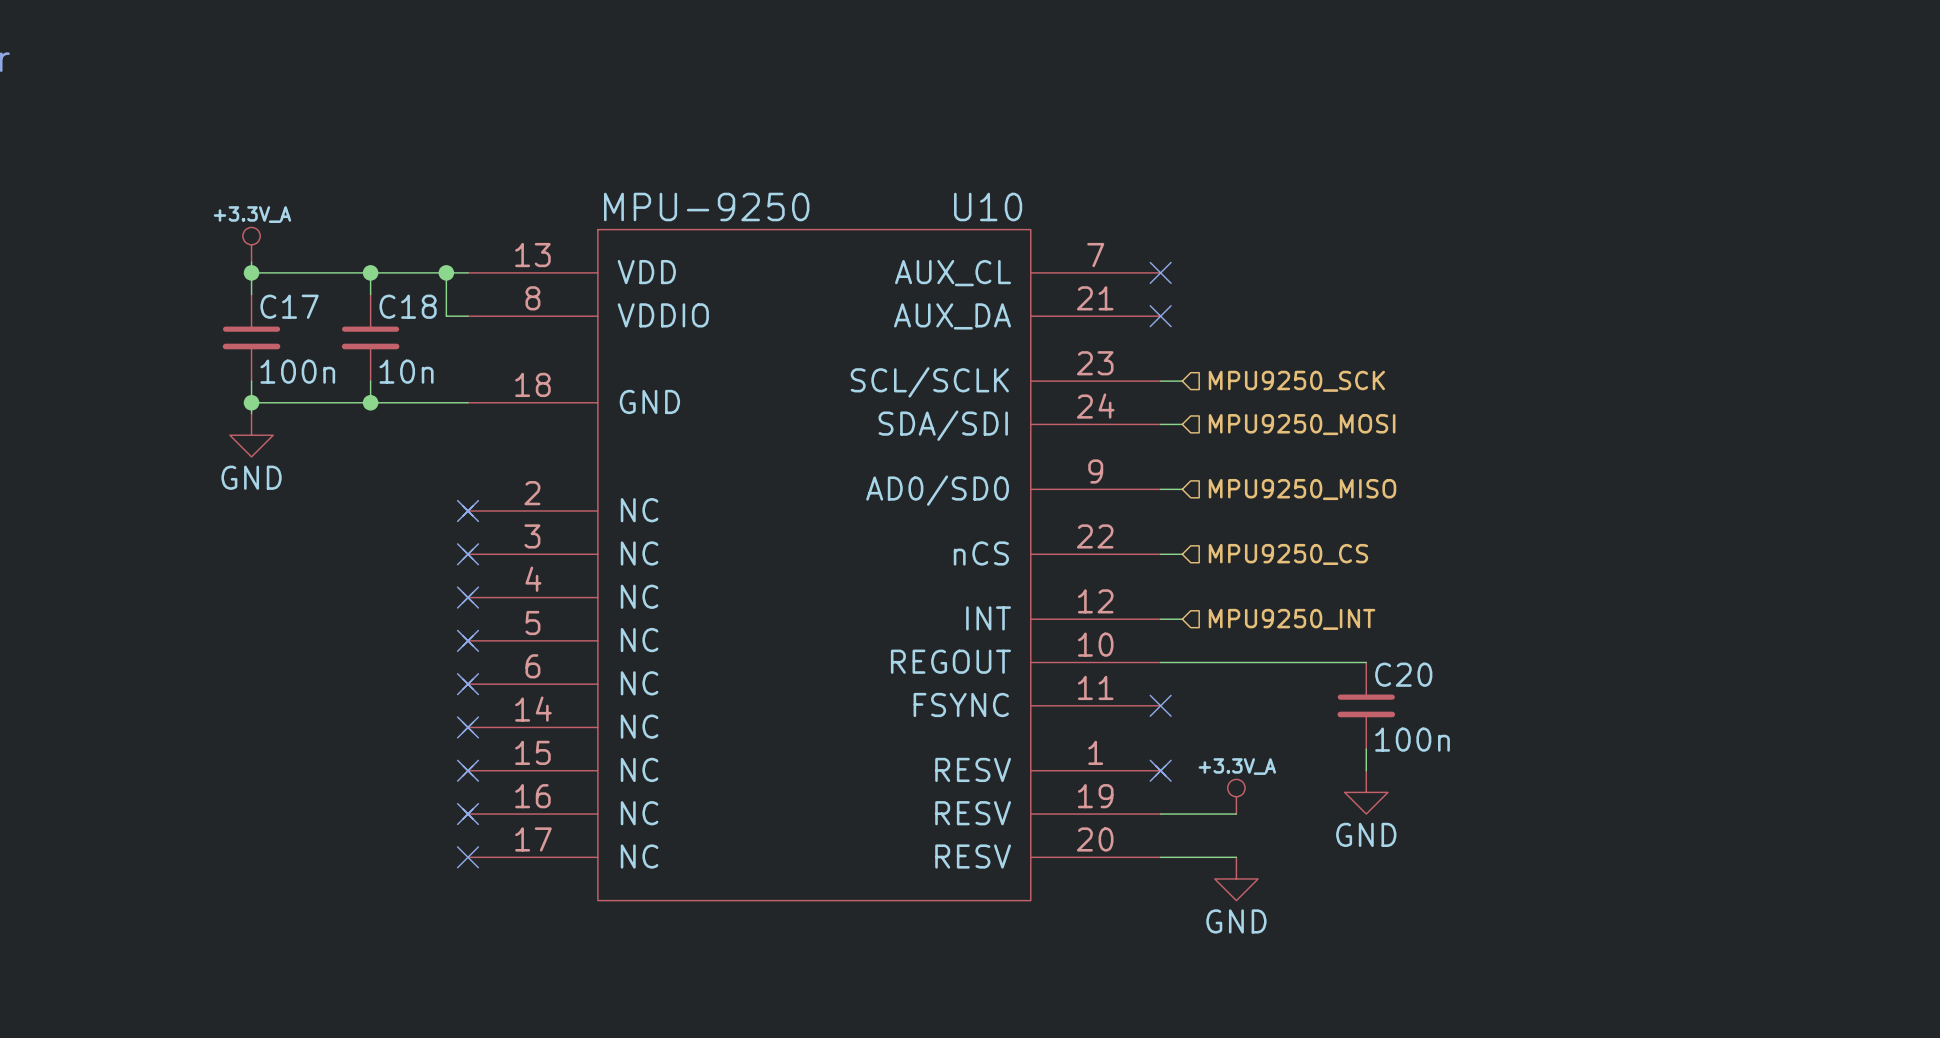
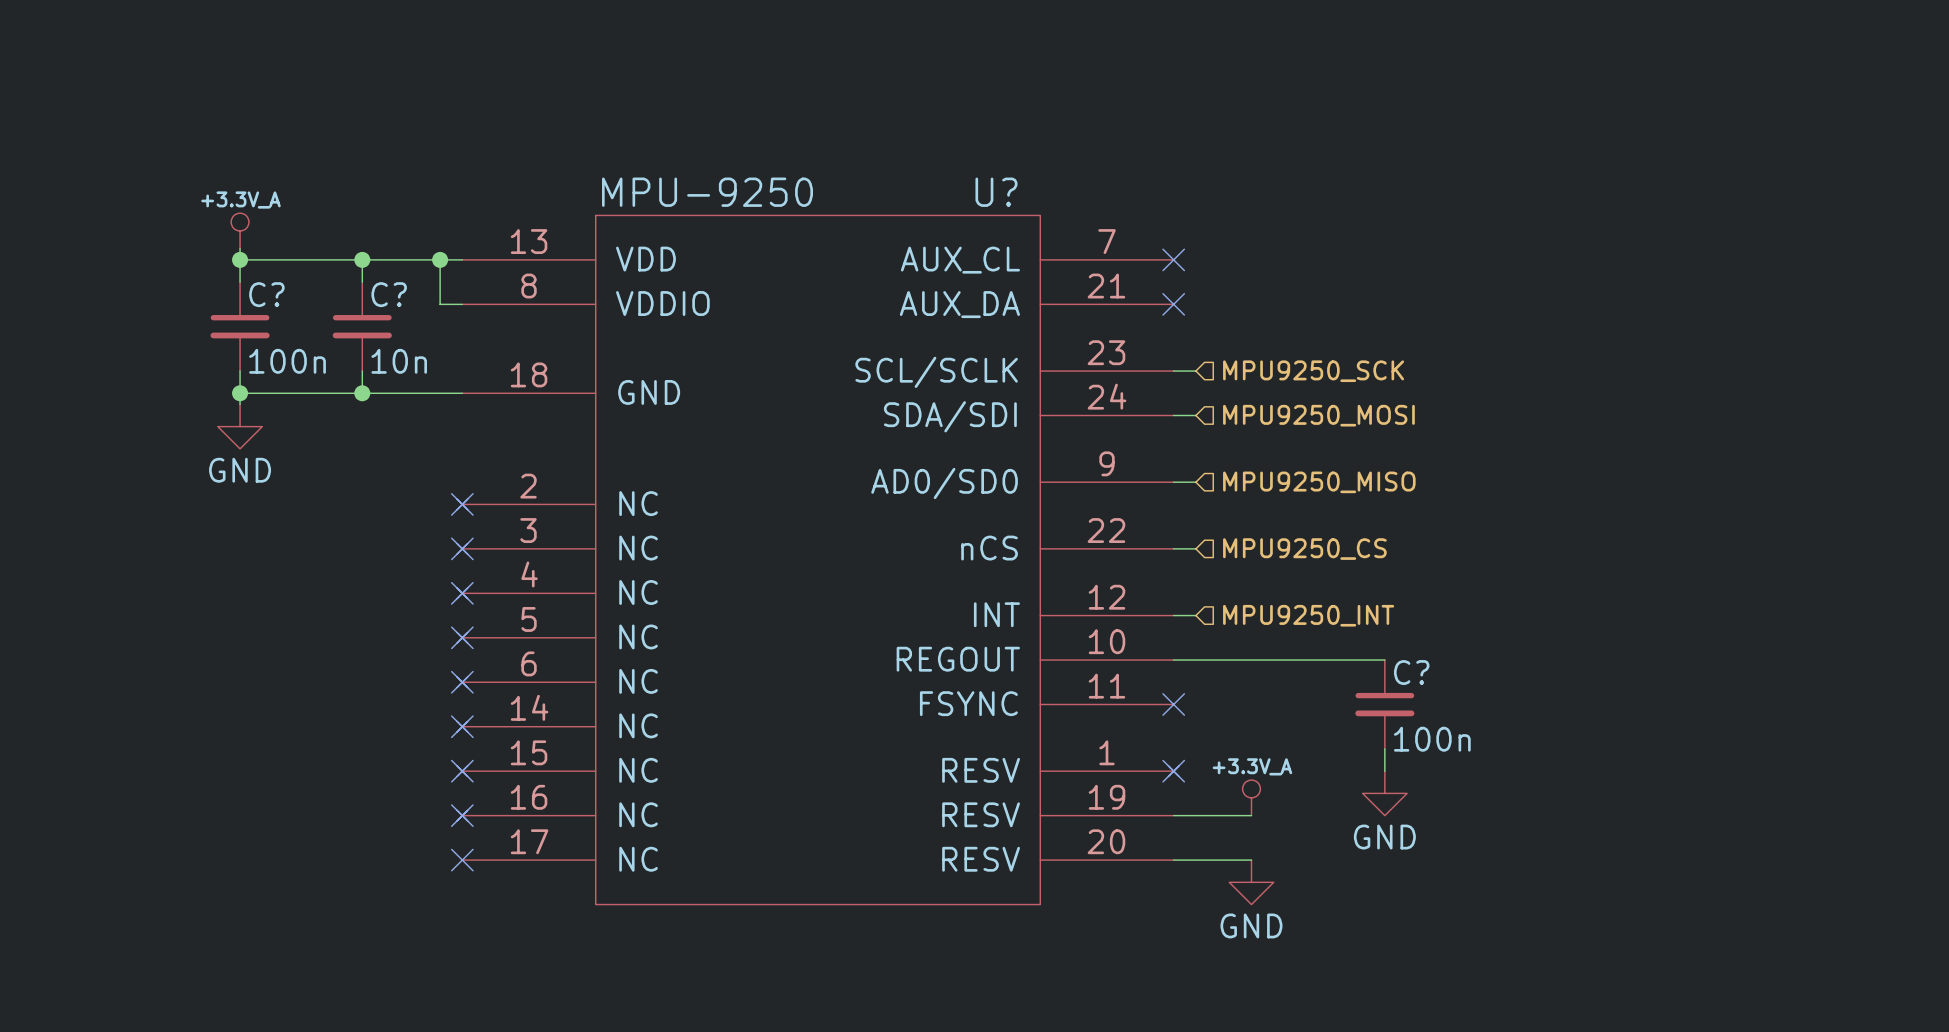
U10 name: U10 (988, 206) -> U? (996, 192)
C17 name: C17 (289, 306) -> C? (266, 294)
C18 name: C18 (408, 306) -> C? (389, 294)
C20 name: C20 (1403, 674) -> C? (1411, 672)

